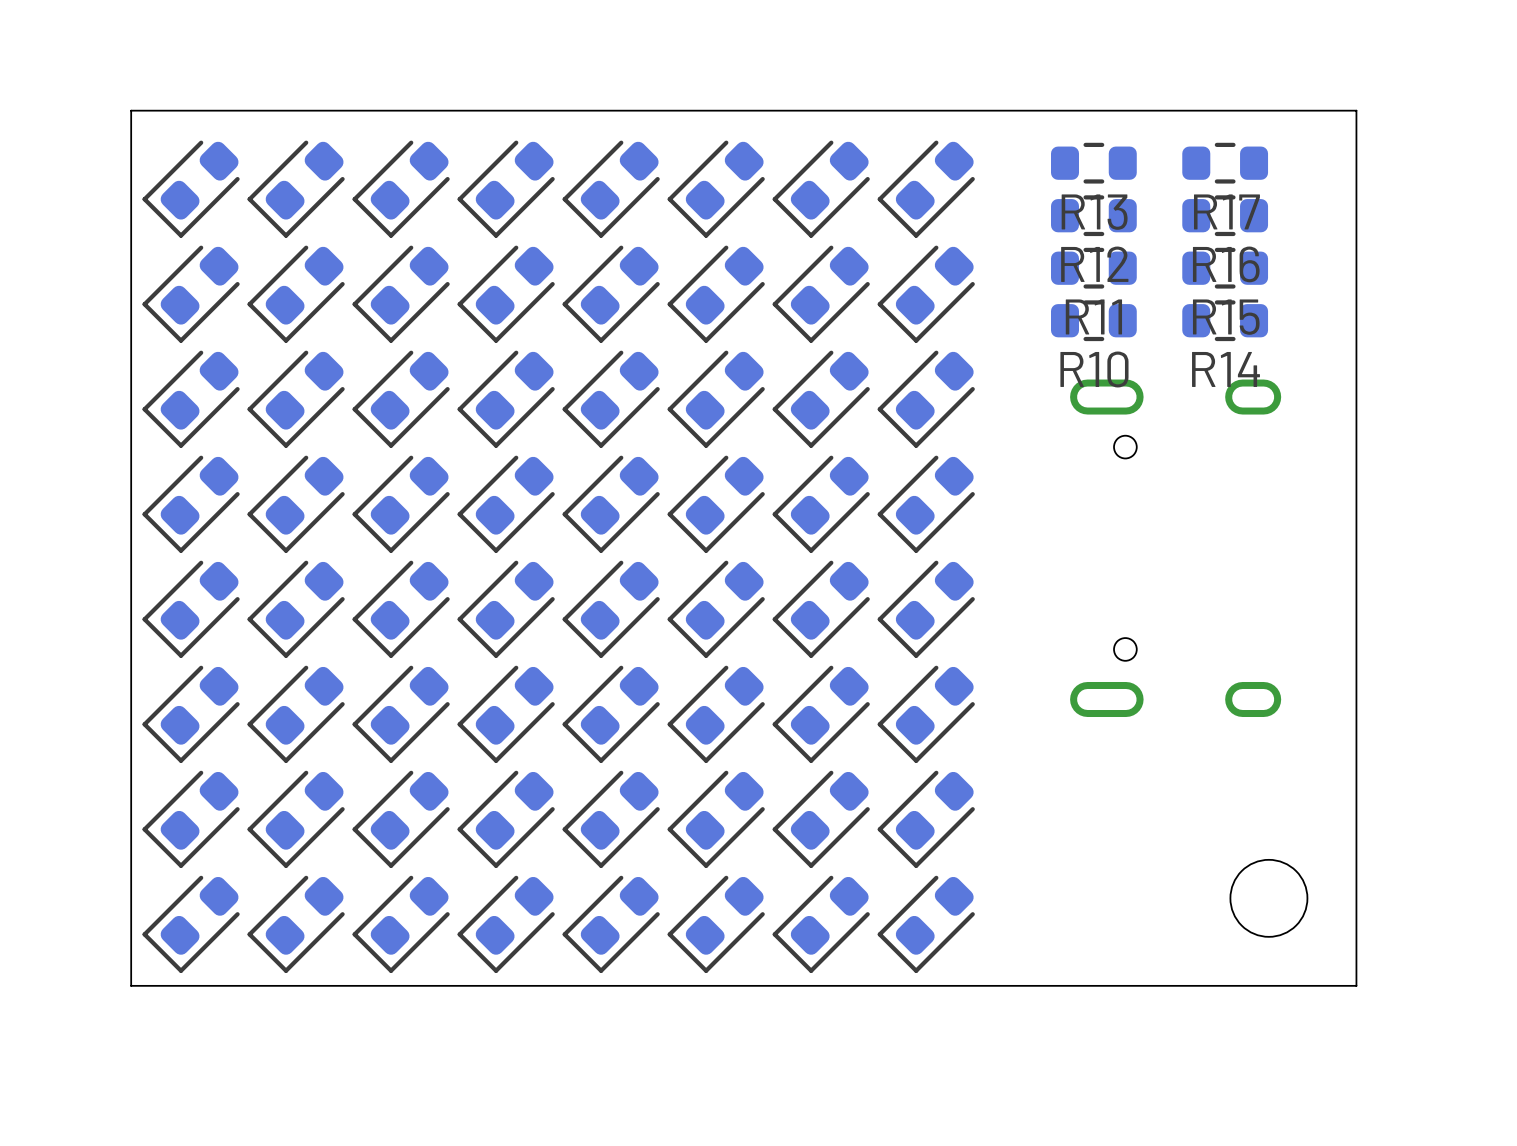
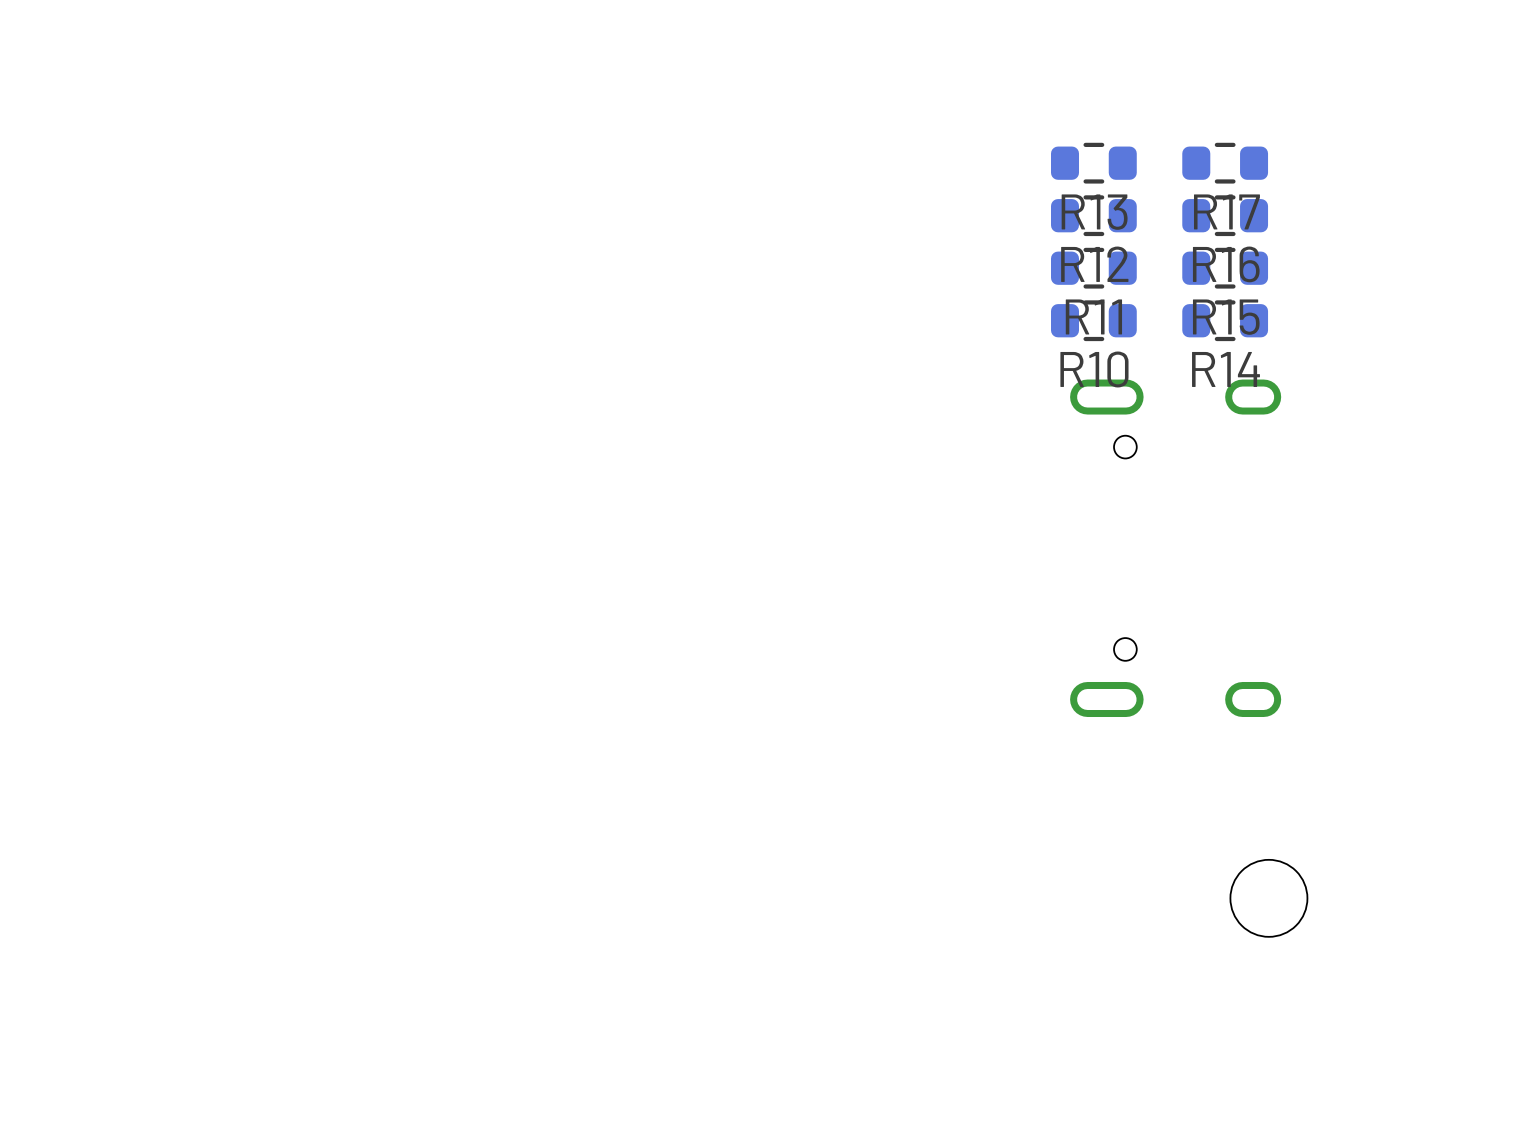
board edge: (1356, 110) (131, 110) (131, 985) (1356, 985) (1356, 110) -> none
part: (191, 189) -> none
part: (296, 189) -> none
part: (401, 189) -> none
part: (506, 189) -> none
part: (611, 189) -> none
part: (716, 189) -> none
part: (821, 189) -> none
part: (926, 189) -> none
part: (191, 294) -> none
part: (296, 294) -> none
part: (401, 294) -> none
part: (506, 294) -> none
part: (611, 294) -> none
part: (716, 294) -> none
part: (821, 294) -> none
part: (926, 294) -> none
part: (191, 399) -> none
part: (296, 399) -> none
part: (401, 399) -> none
part: (506, 399) -> none
part: (611, 399) -> none
part: (716, 399) -> none
part: (821, 399) -> none
part: (926, 399) -> none
part: (191, 504) -> none
part: (296, 504) -> none
part: (401, 504) -> none
part: (506, 504) -> none
part: (611, 504) -> none
part: (716, 504) -> none
part: (821, 504) -> none
part: (926, 504) -> none
part: (191, 609) -> none
part: (296, 609) -> none
part: (401, 609) -> none
part: (506, 609) -> none
part: (611, 609) -> none
part: (716, 609) -> none
part: (821, 609) -> none
part: (926, 609) -> none
part: (191, 714) -> none
part: (296, 714) -> none
part: (401, 714) -> none
part: (506, 714) -> none
part: (611, 714) -> none
part: (716, 714) -> none
part: (821, 714) -> none
part: (926, 714) -> none
part: (191, 819) -> none
part: (296, 819) -> none
part: (401, 819) -> none
part: (506, 819) -> none
part: (611, 819) -> none
part: (716, 819) -> none
part: (821, 819) -> none
part: (926, 819) -> none
part: (191, 924) -> none
part: (296, 924) -> none
part: (401, 924) -> none
part: (506, 924) -> none
part: (611, 924) -> none
part: (716, 924) -> none
part: (821, 924) -> none
part: (926, 924) -> none

